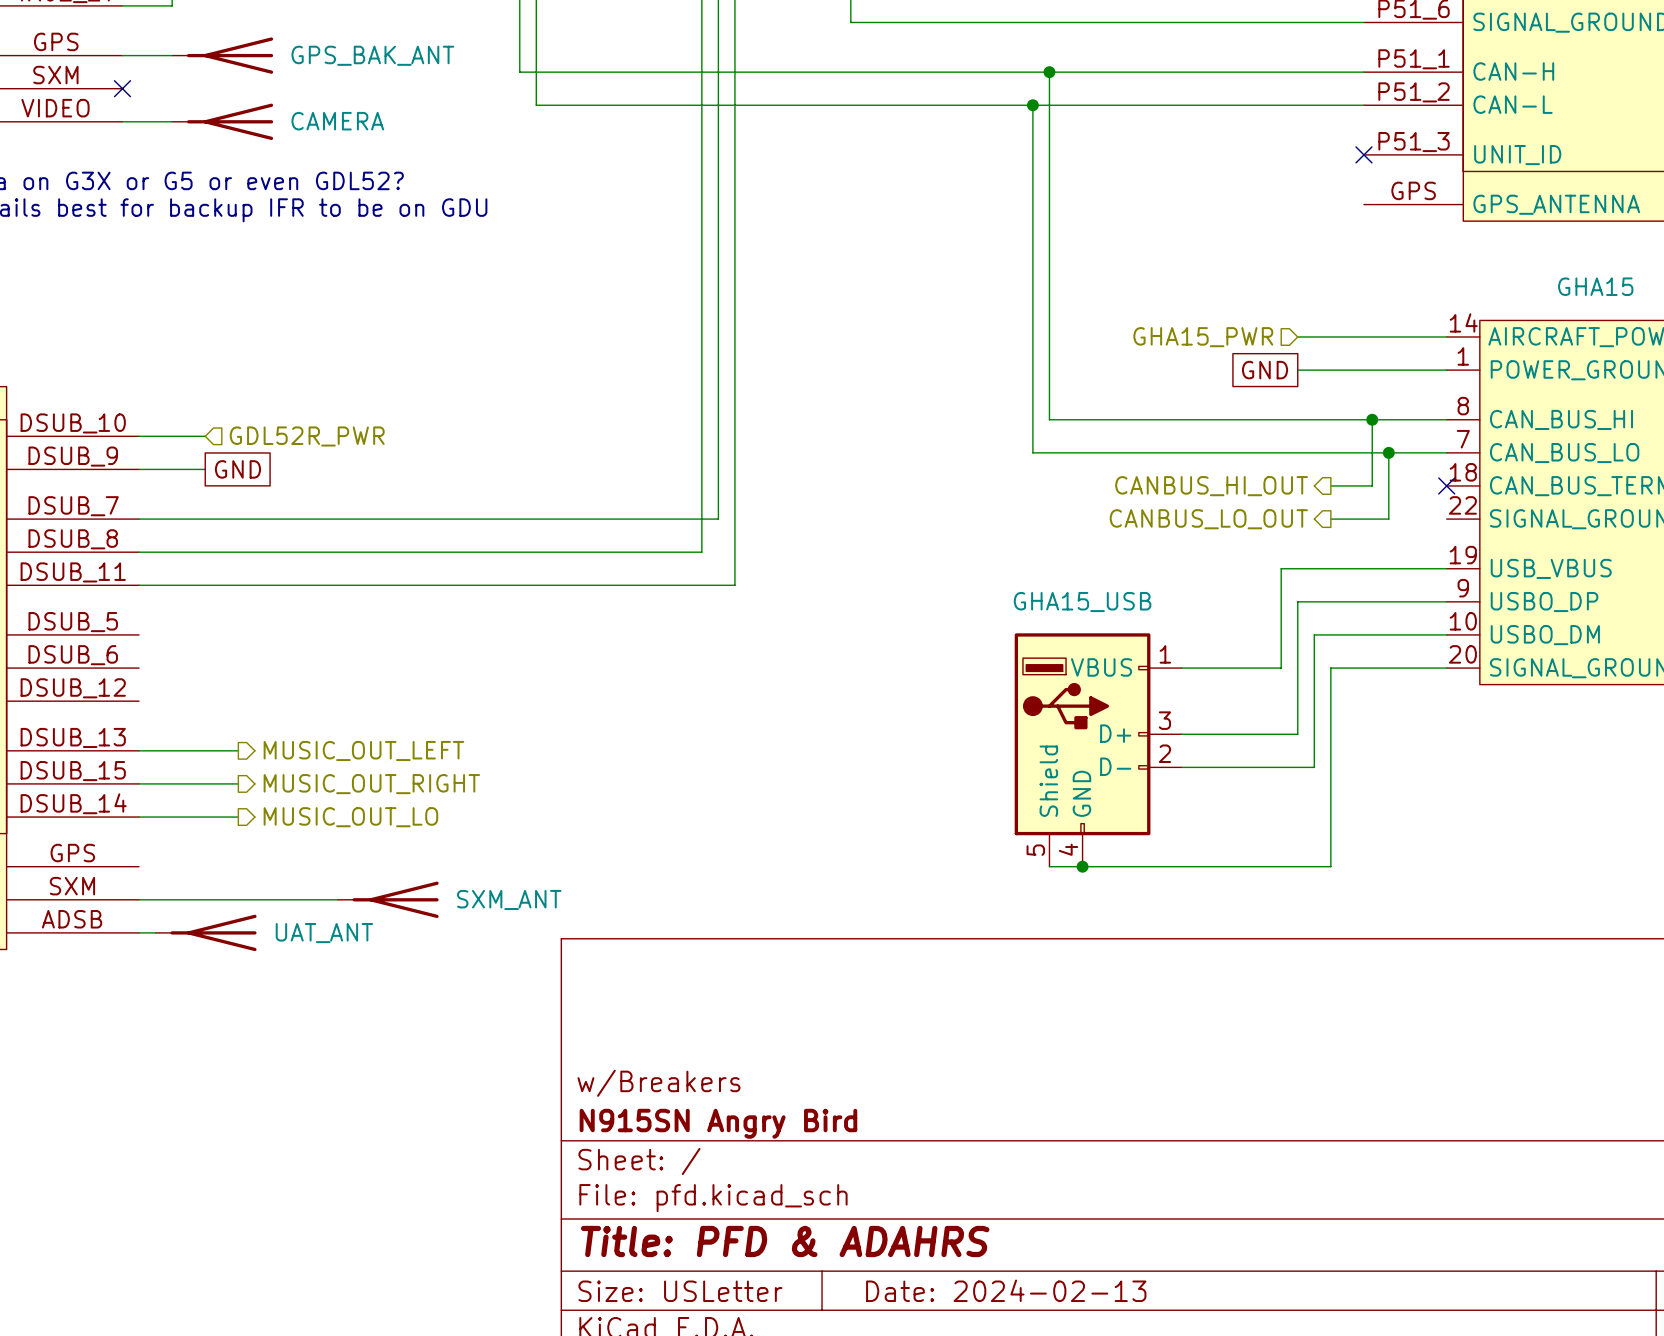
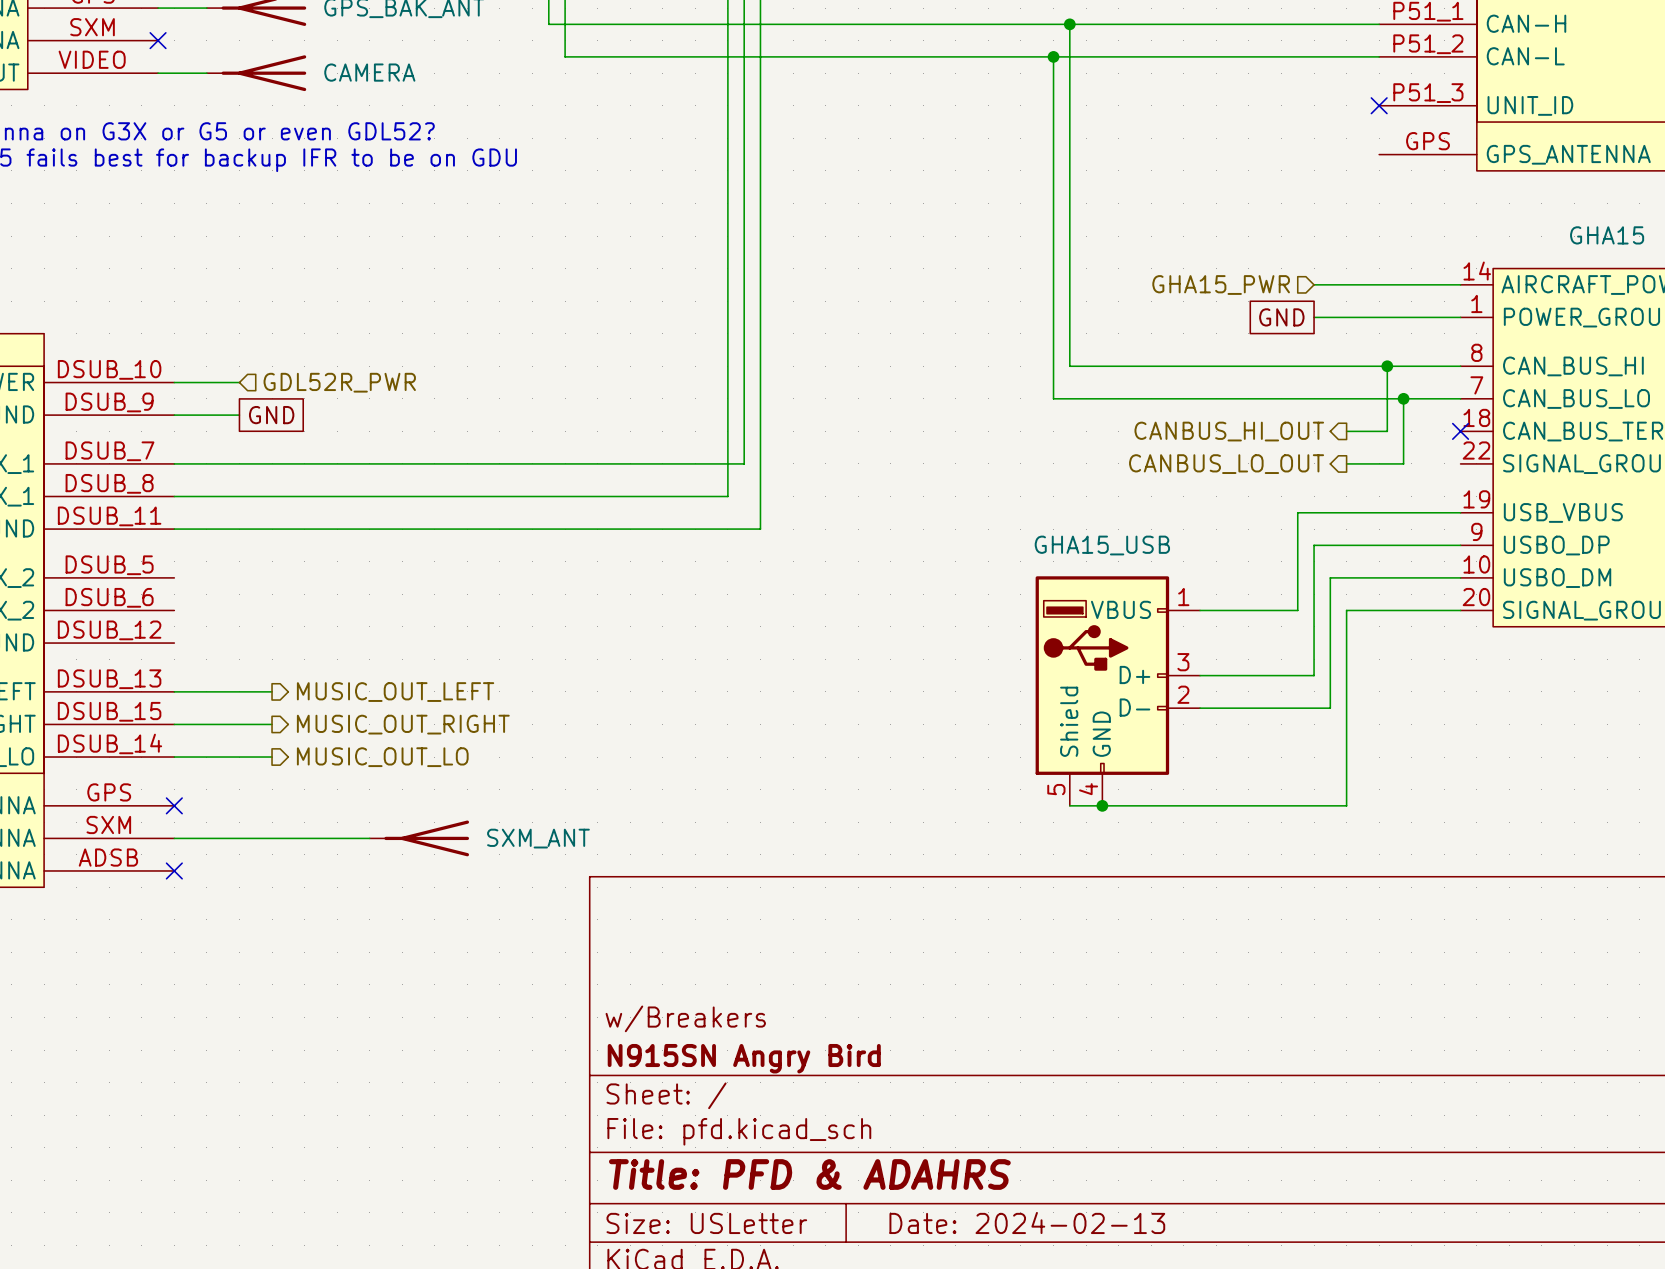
no-connect mark: none -> (174, 805)
wire: (139, 932) (155, 932) -> none
no-connect mark: none -> (174, 870)
UAT_ANT: (206, 932) -> none

